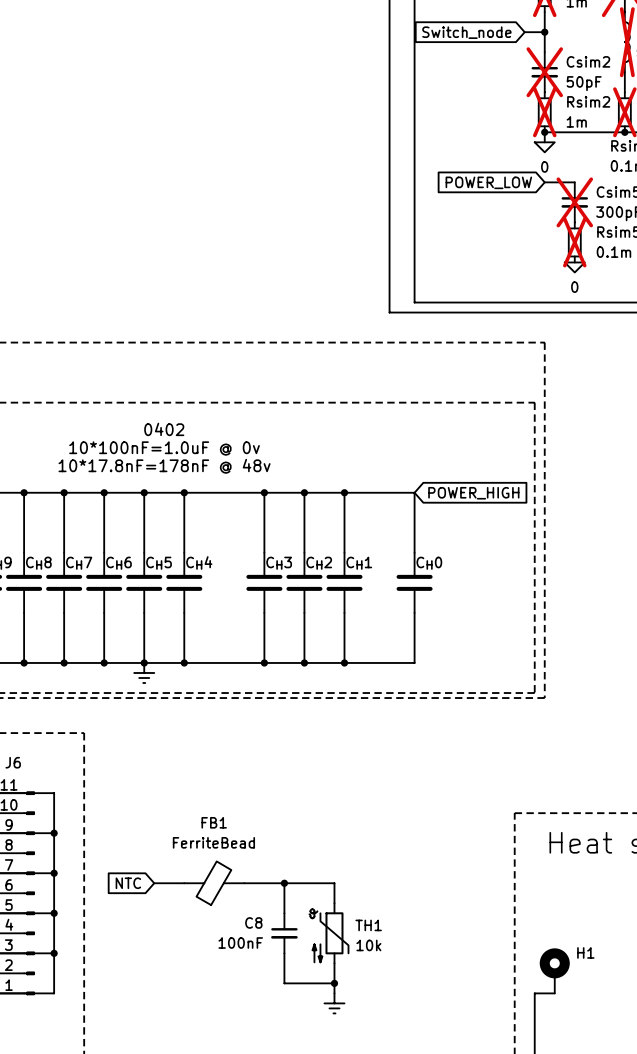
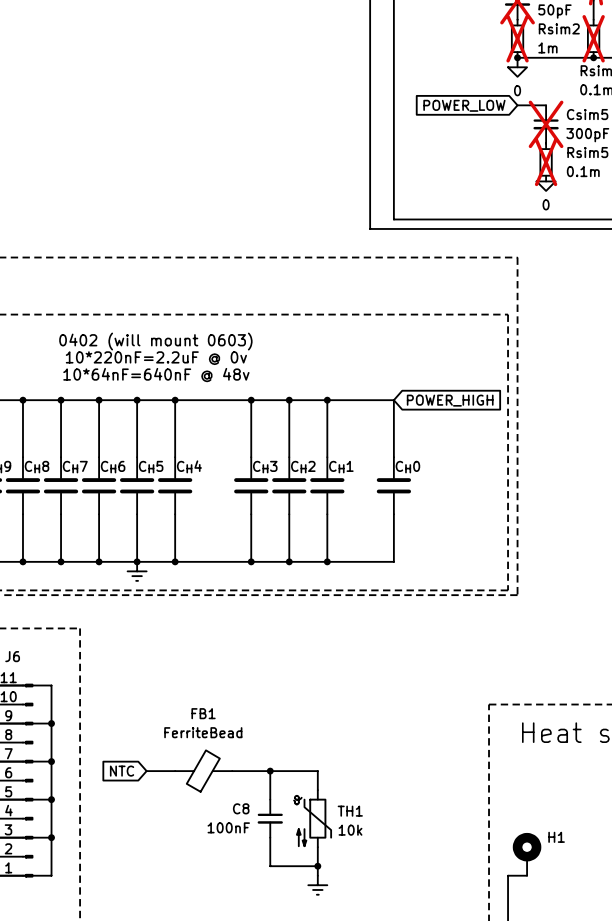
text: 0402 (164, 429) -> 0402 (will mount 0603) (155, 341)
text: 10*100nF=1.0uF @ 0v (164, 448) -> 10*220nF=2.2uF @ 0v (156, 358)
text: 10*17.8nF=178nF @ 48v (164, 466) -> 10*64nF=640nF @ 48v (156, 375)

